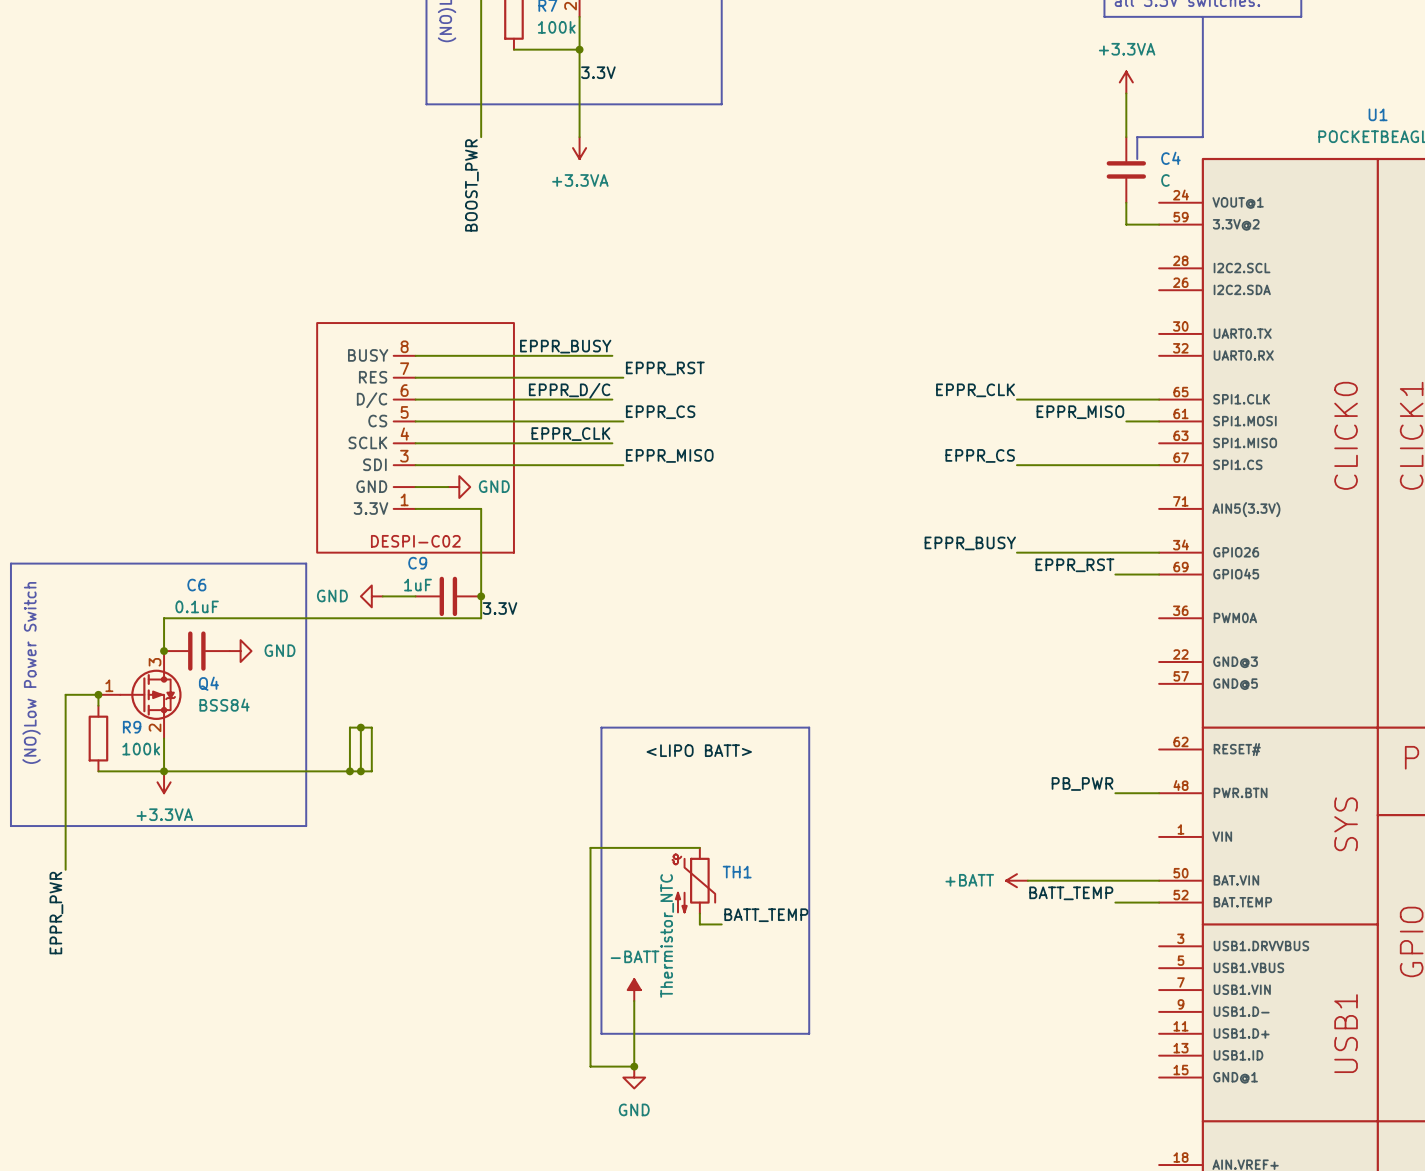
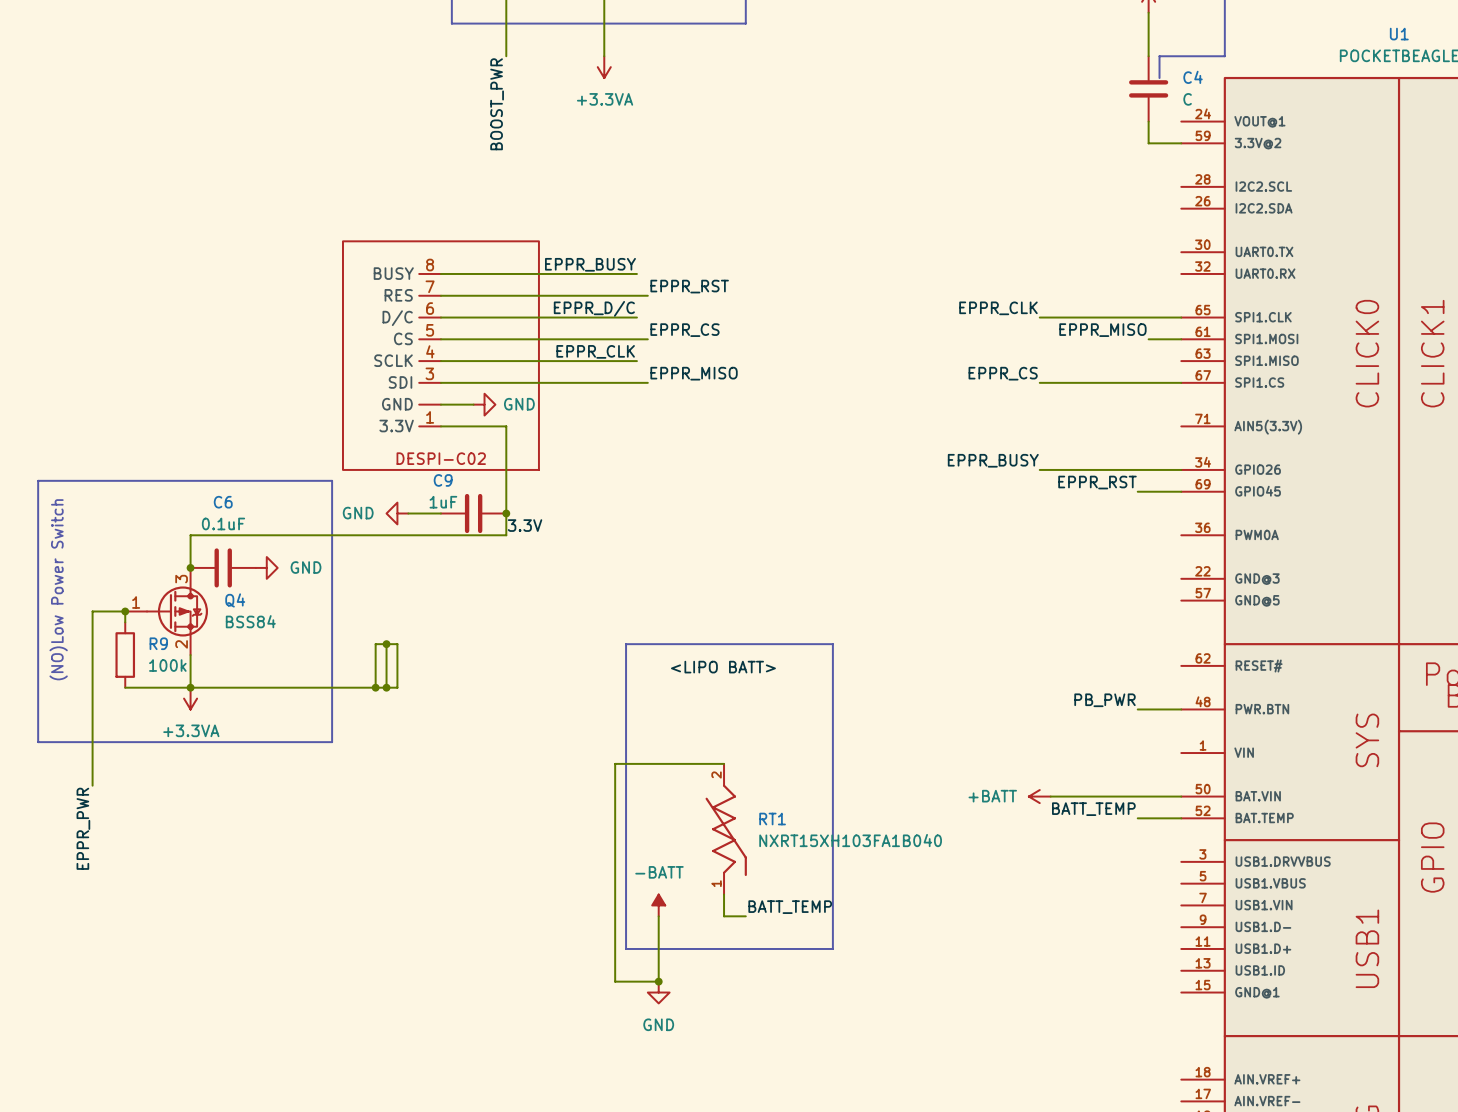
TH1: Thermistor_NTC (693, 880) -> none
wire: (699, 913) (699, 924) (721, 924) -> none
RT1: none -> NXRT15XH103FA1B040 (726, 829)
label position: BATT_TEMP (766, 915) -> BATT_TEMP (790, 907)
wire: none -> (724, 894) (724, 916) (745, 916)

